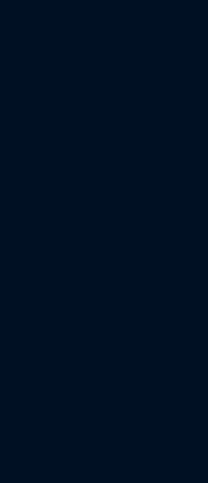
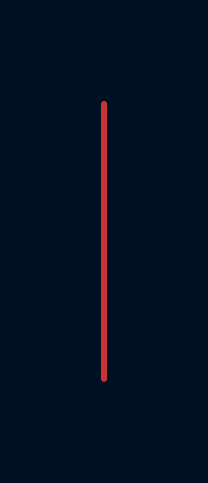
top track: none -> (104, 104) (104, 378)

